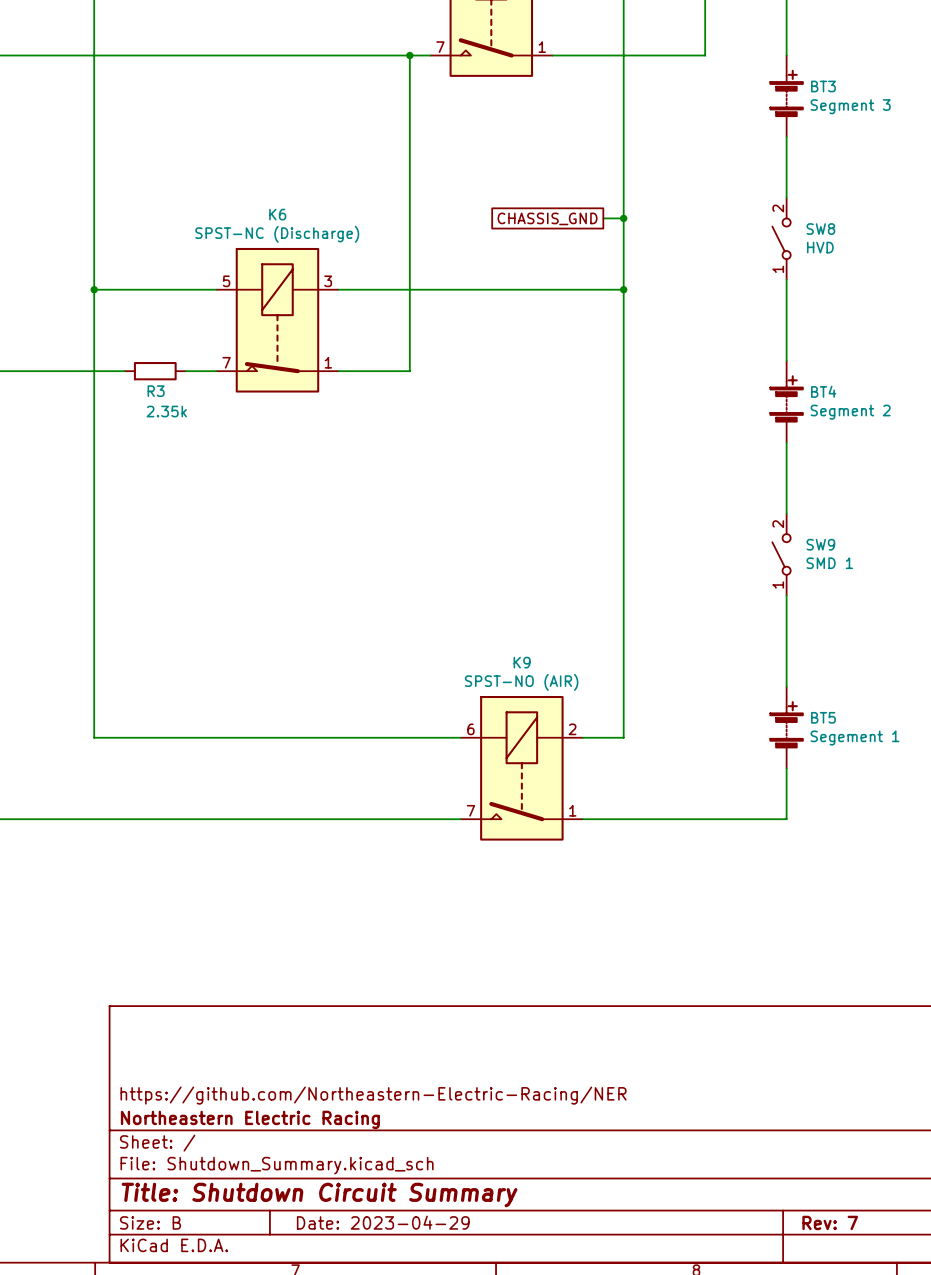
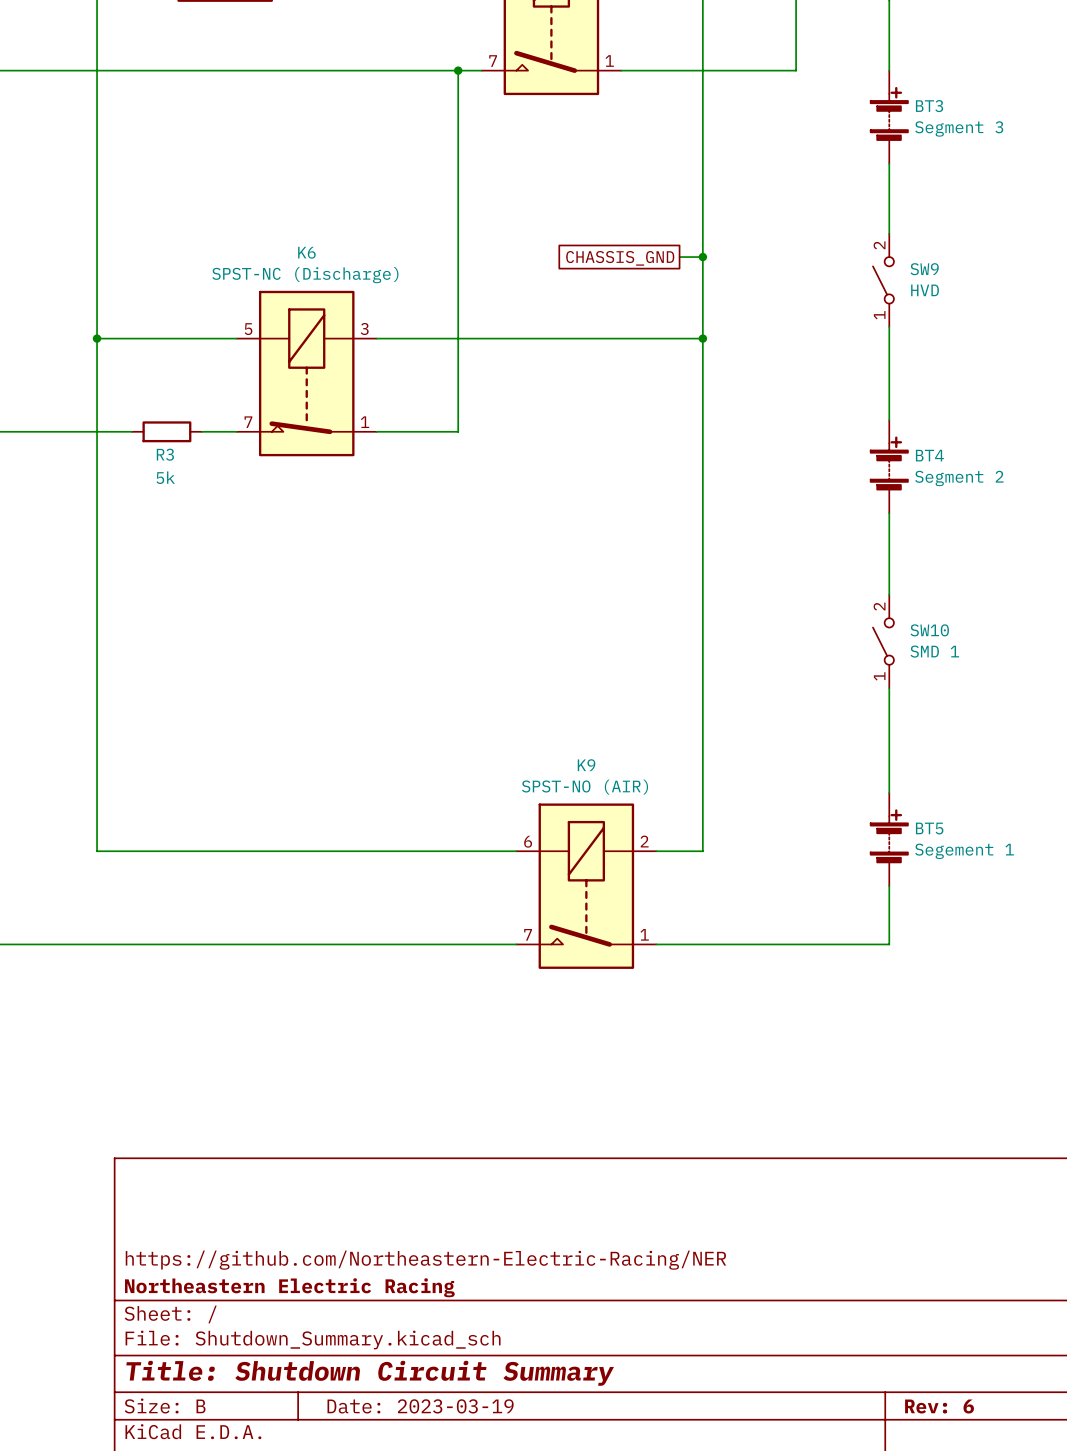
SW8 name: SW8 (820, 229) -> SW9 (924, 269)
R3 value: 2.35k (166, 411) -> 5k (165, 477)
SW9 name: SW9 (820, 544) -> SW10 (929, 630)
title block: Date: 2023-04-29 (383, 1222) -> Date: 2023-03-19 (420, 1406)
title block: Rev: 7 (830, 1222) -> Rev: 6 (939, 1406)

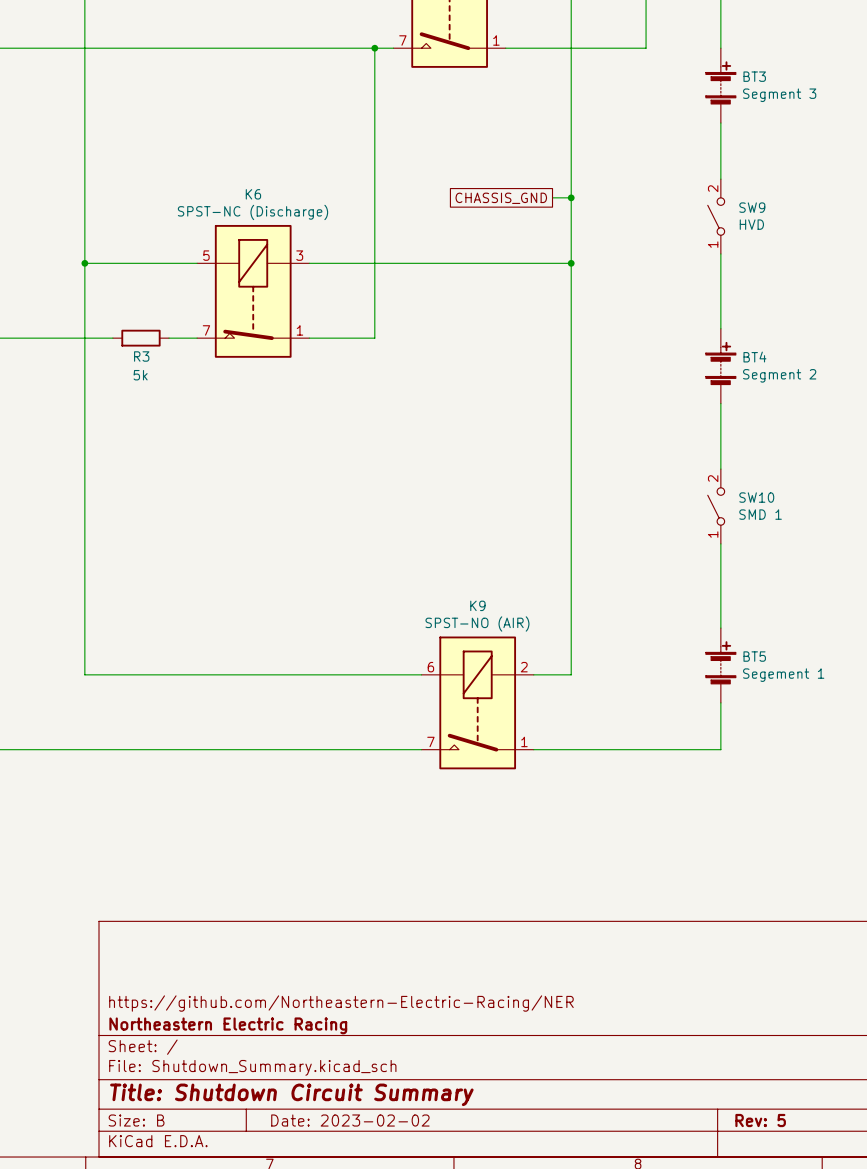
title block: Date: 2023-03-19 (420, 1406) -> Date: 2023-02-02 (350, 1120)
title block: Rev: 6 (939, 1406) -> Rev: 5 (760, 1120)

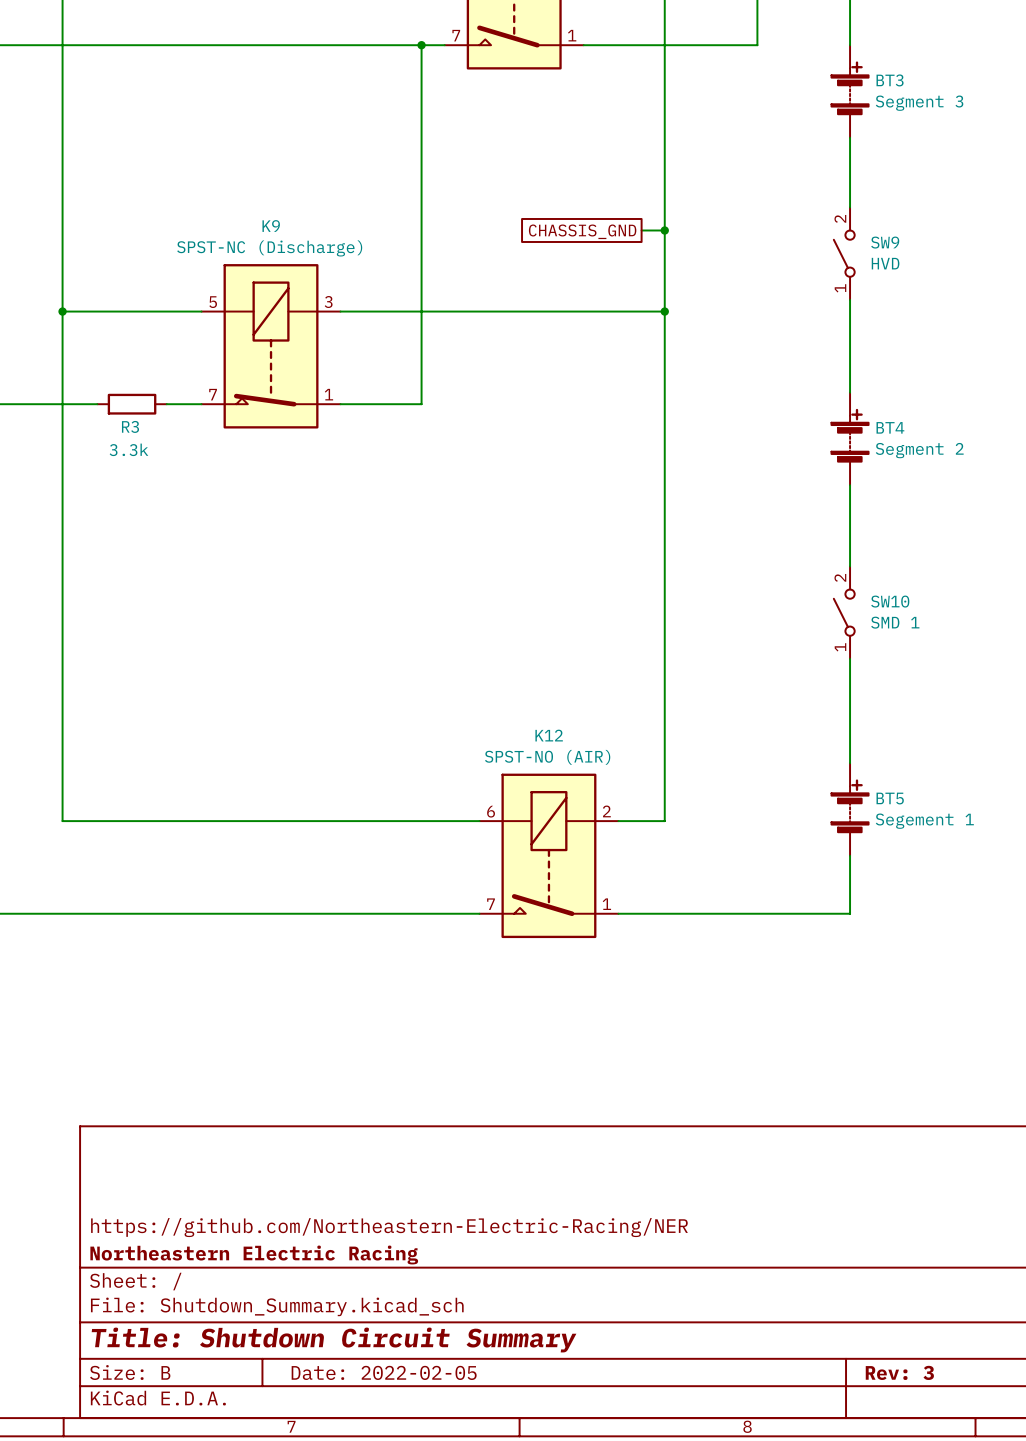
K6 name: K6 (253, 194) -> K9 (271, 226)
R3 value: 5k (140, 375) -> 3.3k (128, 449)
K9 name: K9 (477, 605) -> K12 (549, 735)
title block: Date: 2023-02-02 (350, 1120) -> Date: 2022-02-05 (384, 1372)
title block: Rev: 5 (760, 1120) -> Rev: 3 (899, 1372)

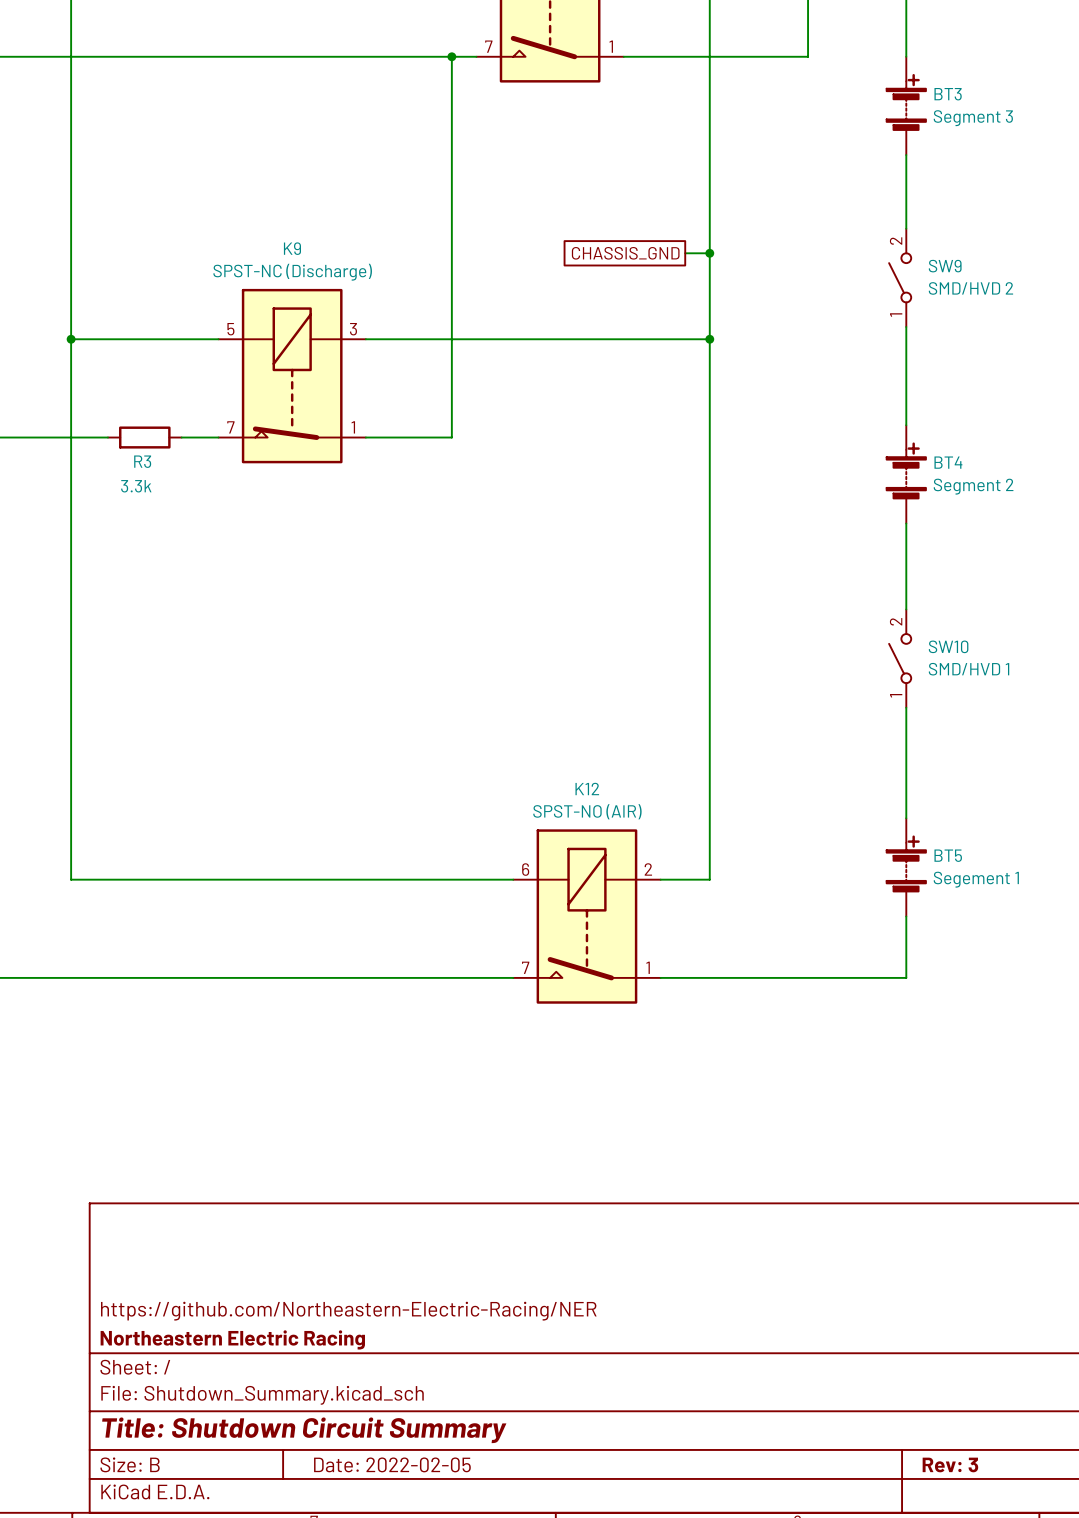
SW9 value: HVD (885, 263) -> SMD/HVD 2 (970, 288)
SW10 value: SMD 1 (895, 622) -> SMD/HVD 1 (969, 669)

